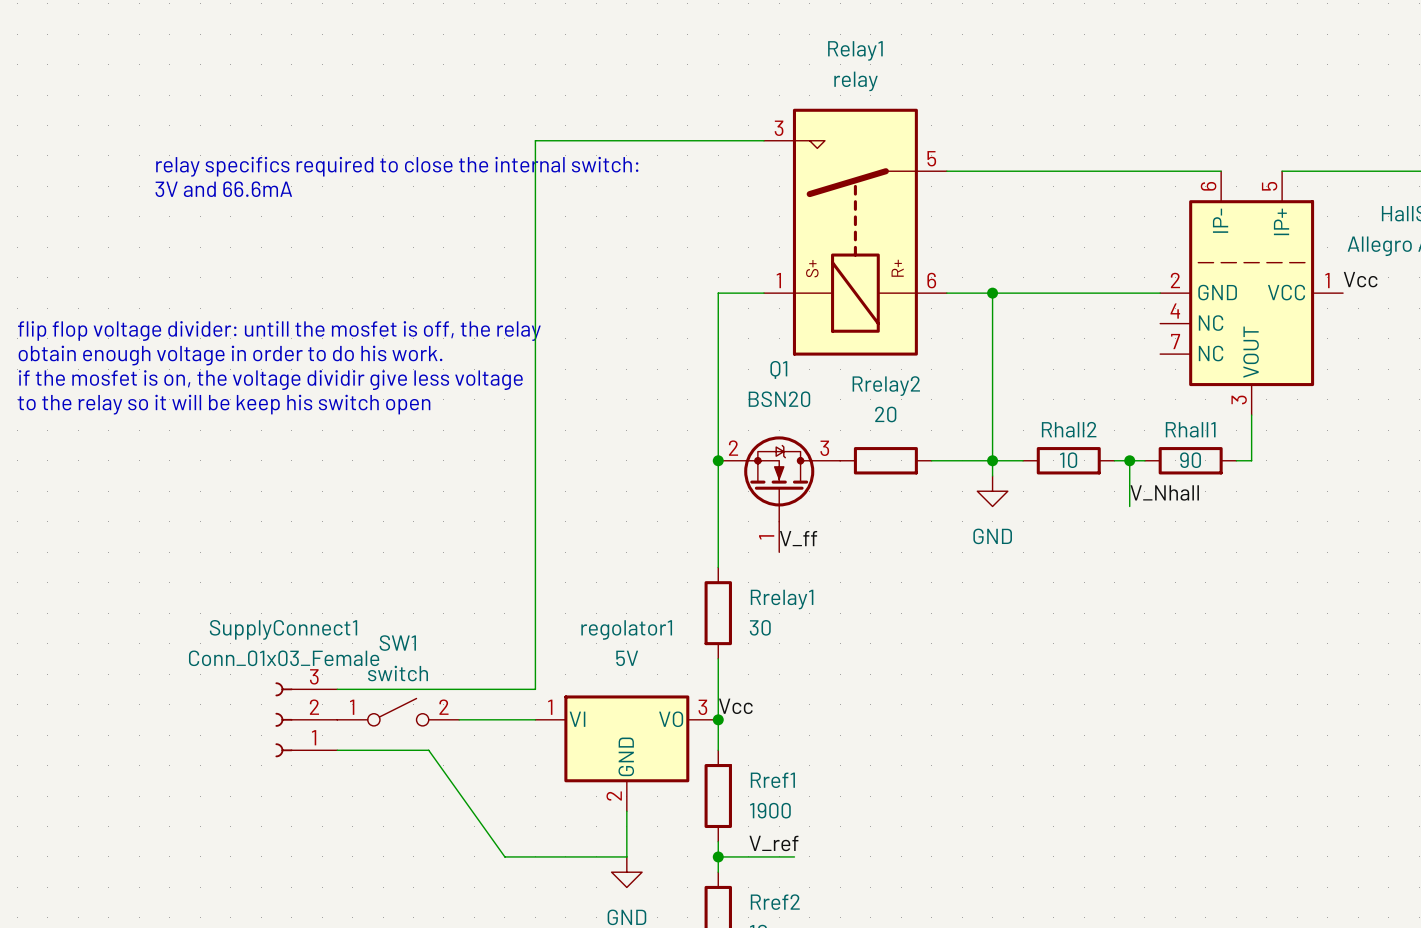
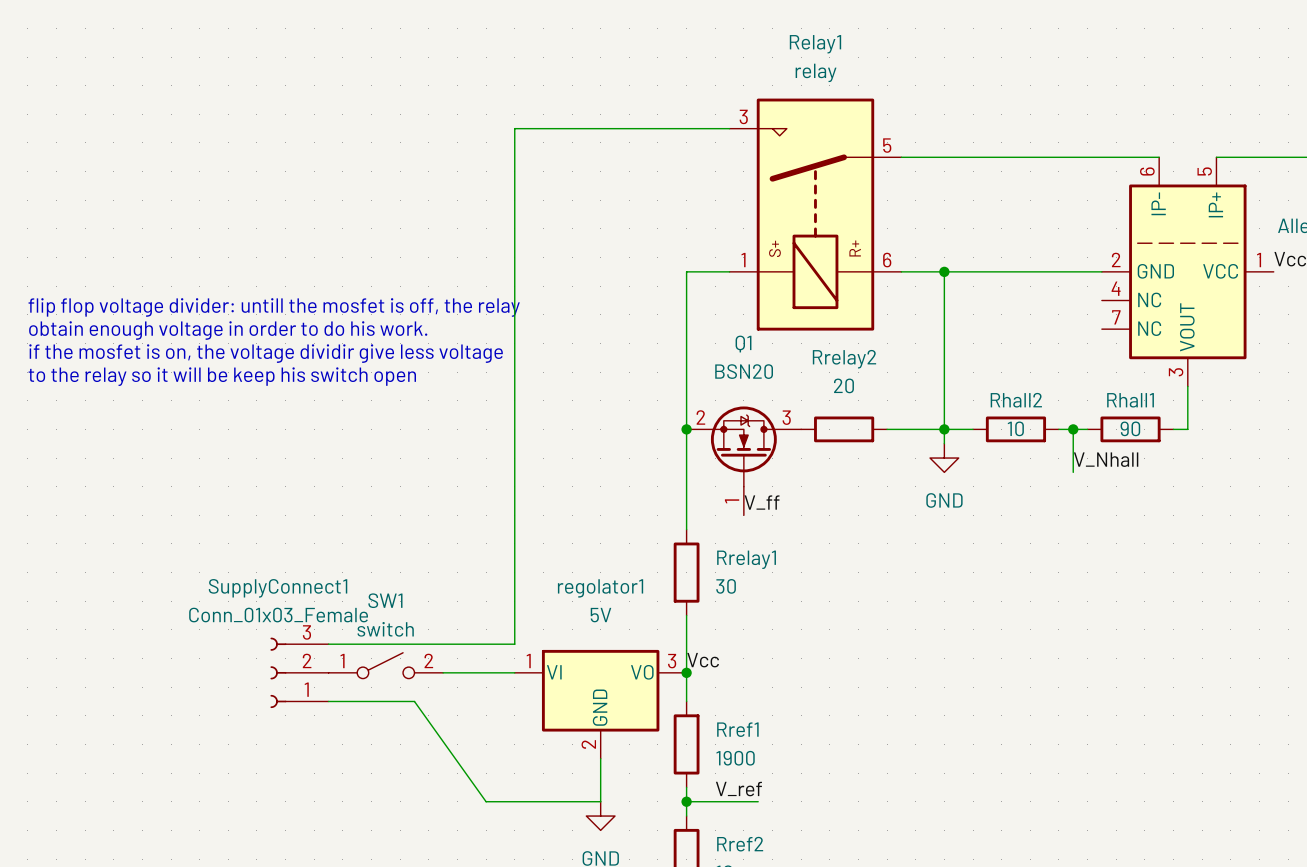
text: relay specifics required to close the internal switch: (397, 166) -> none
text: 3V and 66.6mA (223, 189) -> none

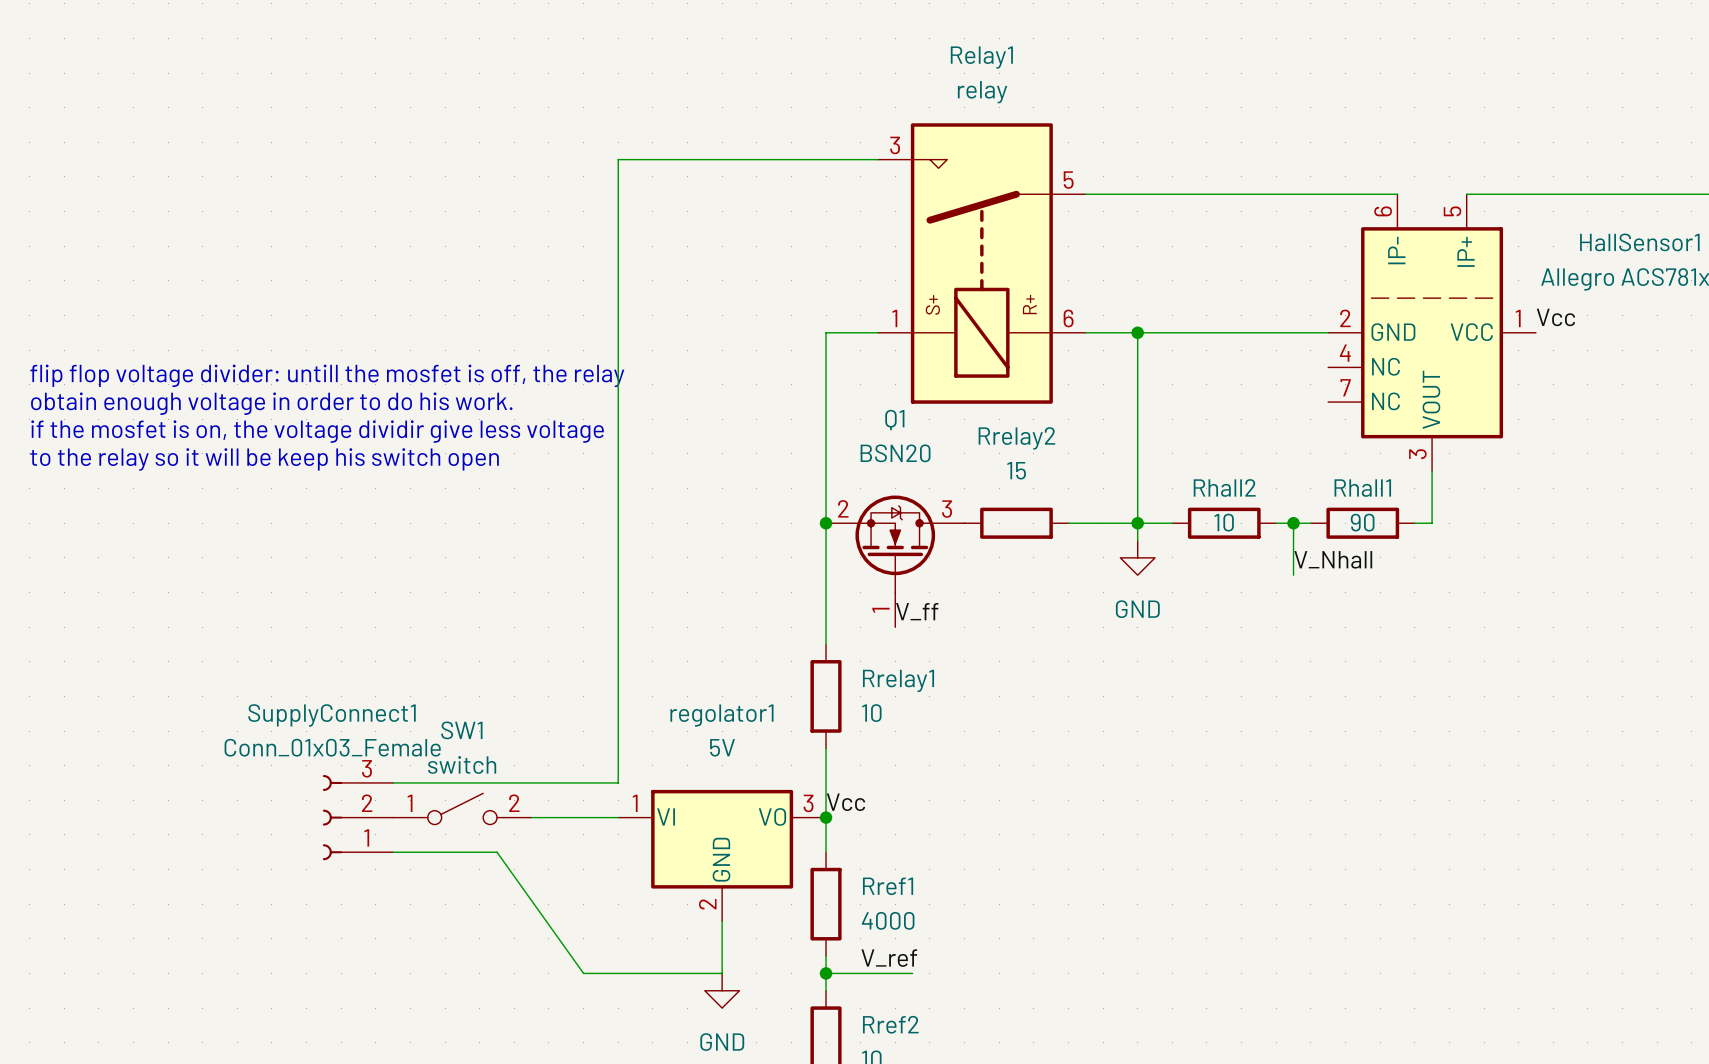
Rrelay2 value: 20 (843, 385) -> 15 (1016, 470)
Rrelay1 value: 30 (726, 586) -> 10 (871, 713)
Rref1 value: 1900 (735, 758) -> 4000 (888, 920)

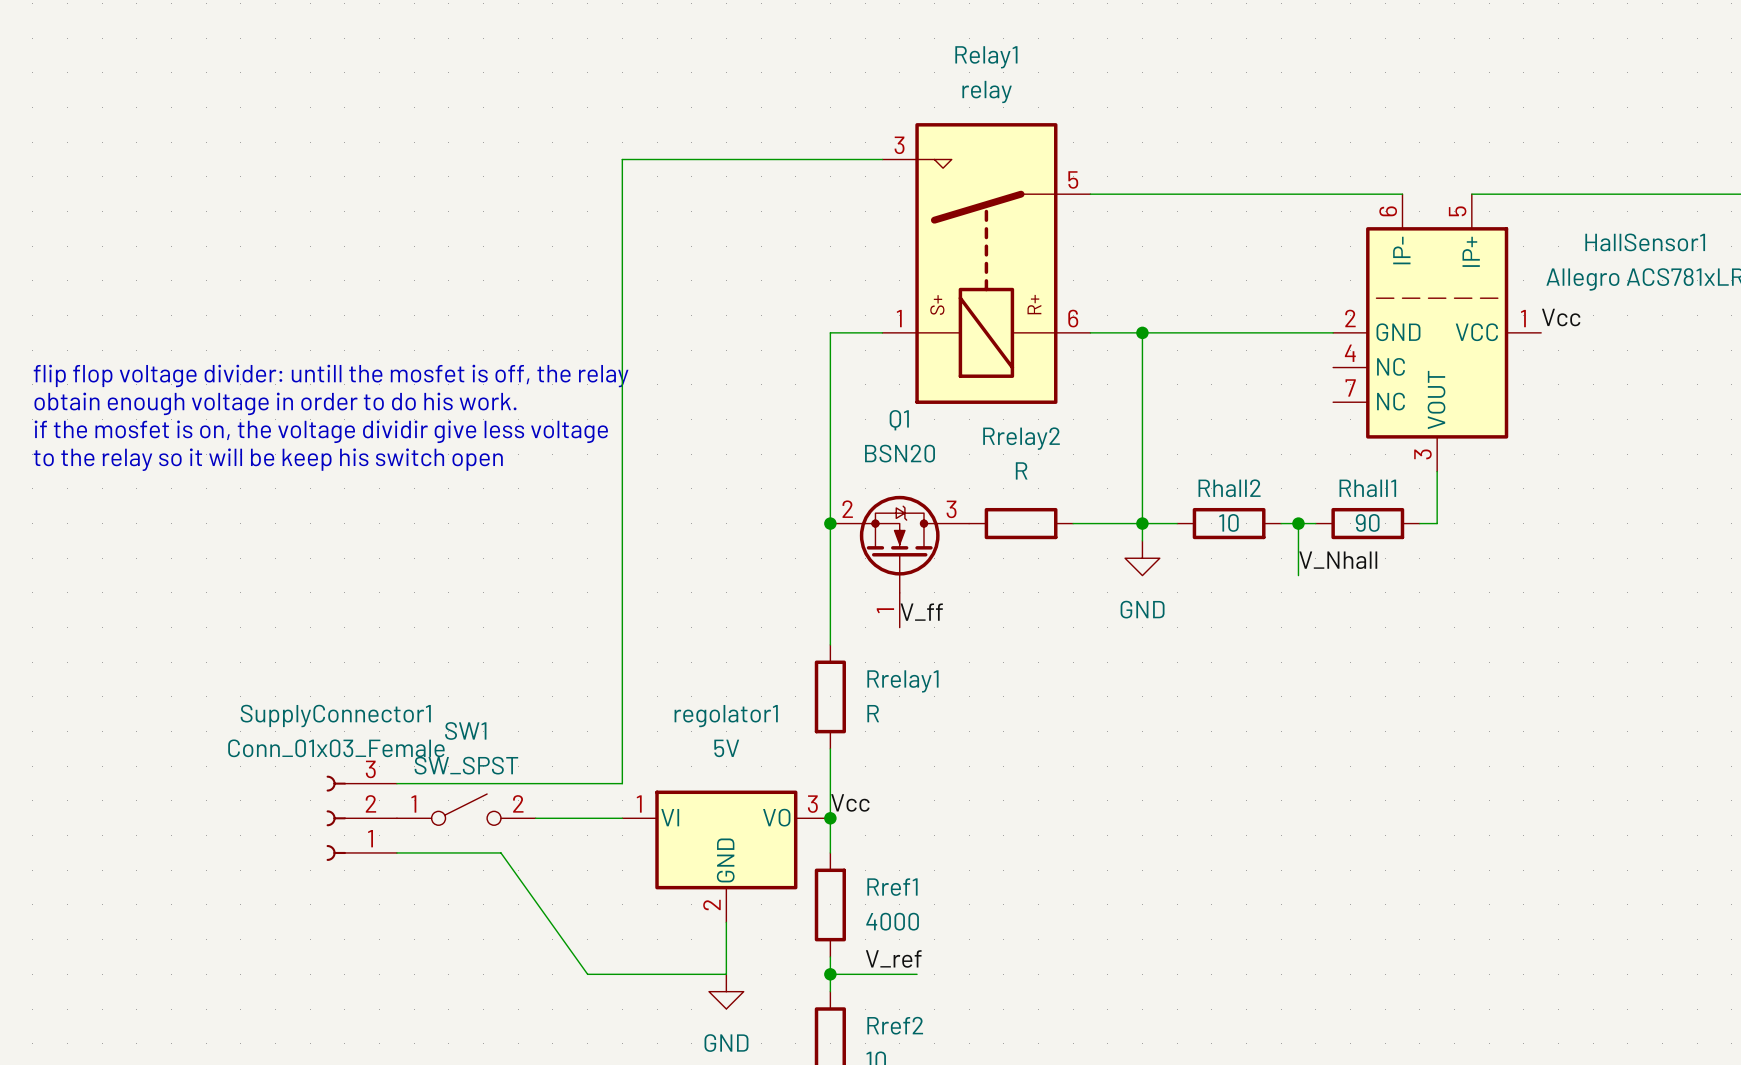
Rrelay2 value: 15 (1016, 470) -> R (1021, 470)
Rrelay1 value: 10 (871, 713) -> R (873, 713)
SupplyConnect1 name: SupplyConnect1 (332, 715) -> SupplyConnector1 (335, 716)
SW1 value: switch (462, 764) -> SW_SPST (466, 765)

